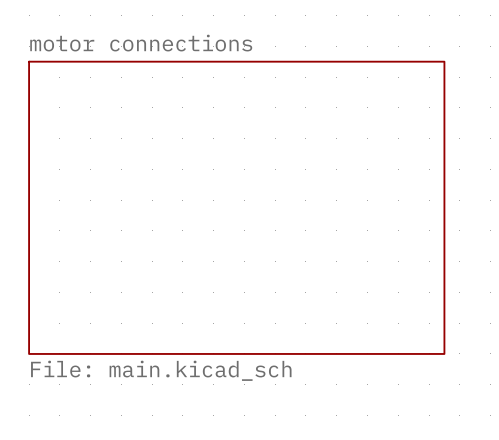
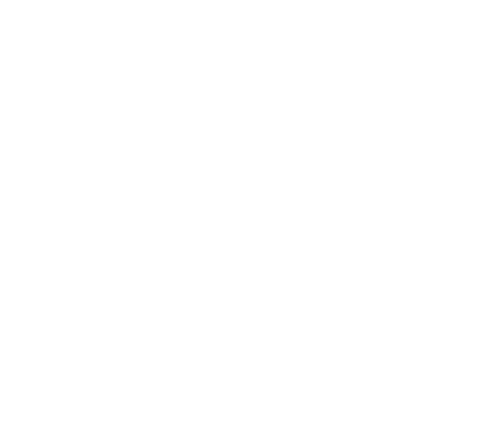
sheet motor connections: File: main.kicad_sch (236, 207) -> none

